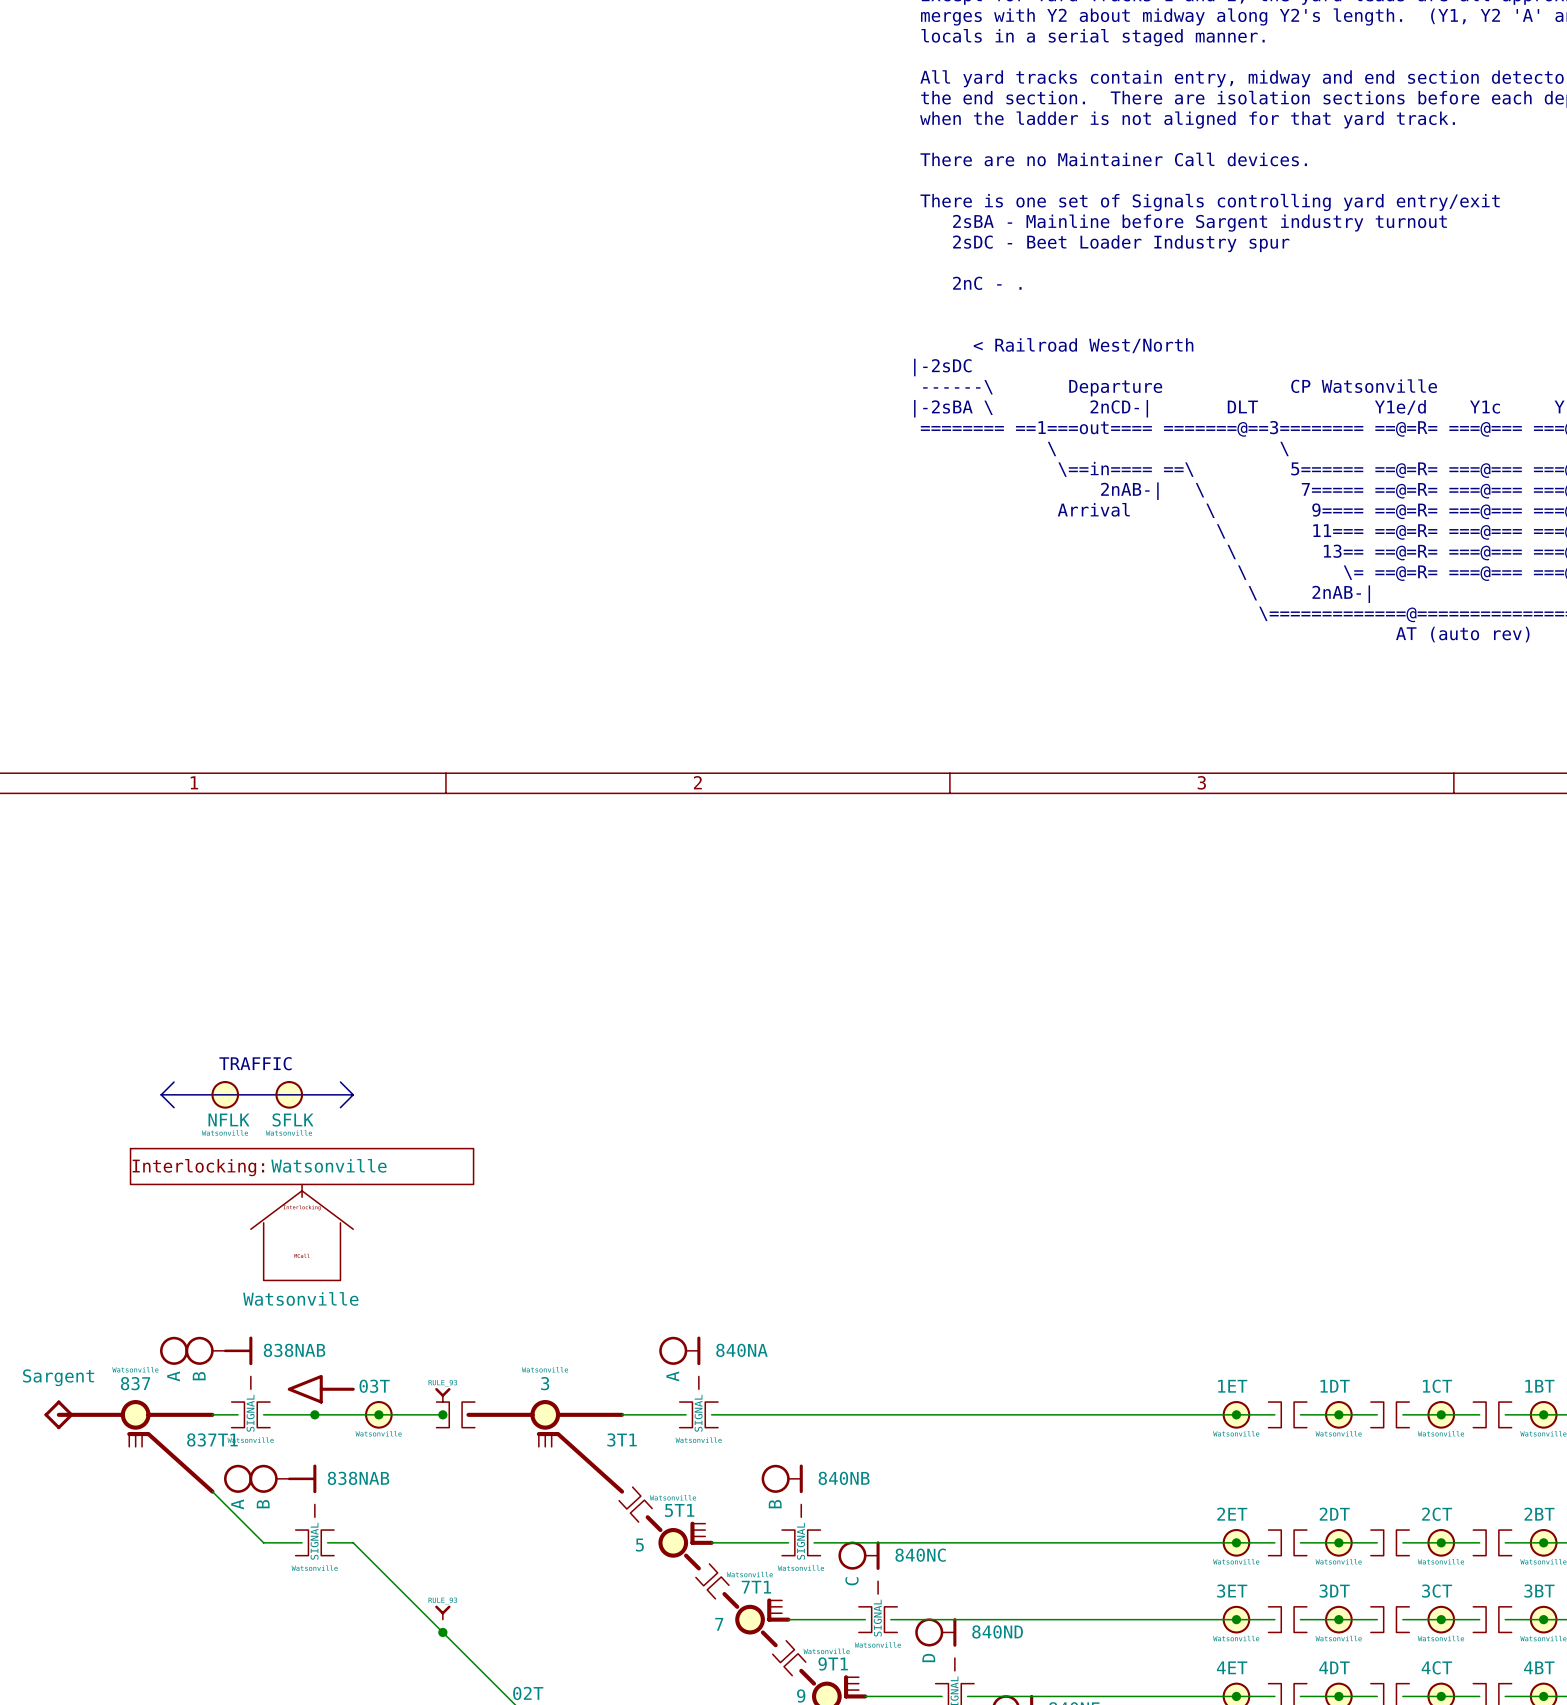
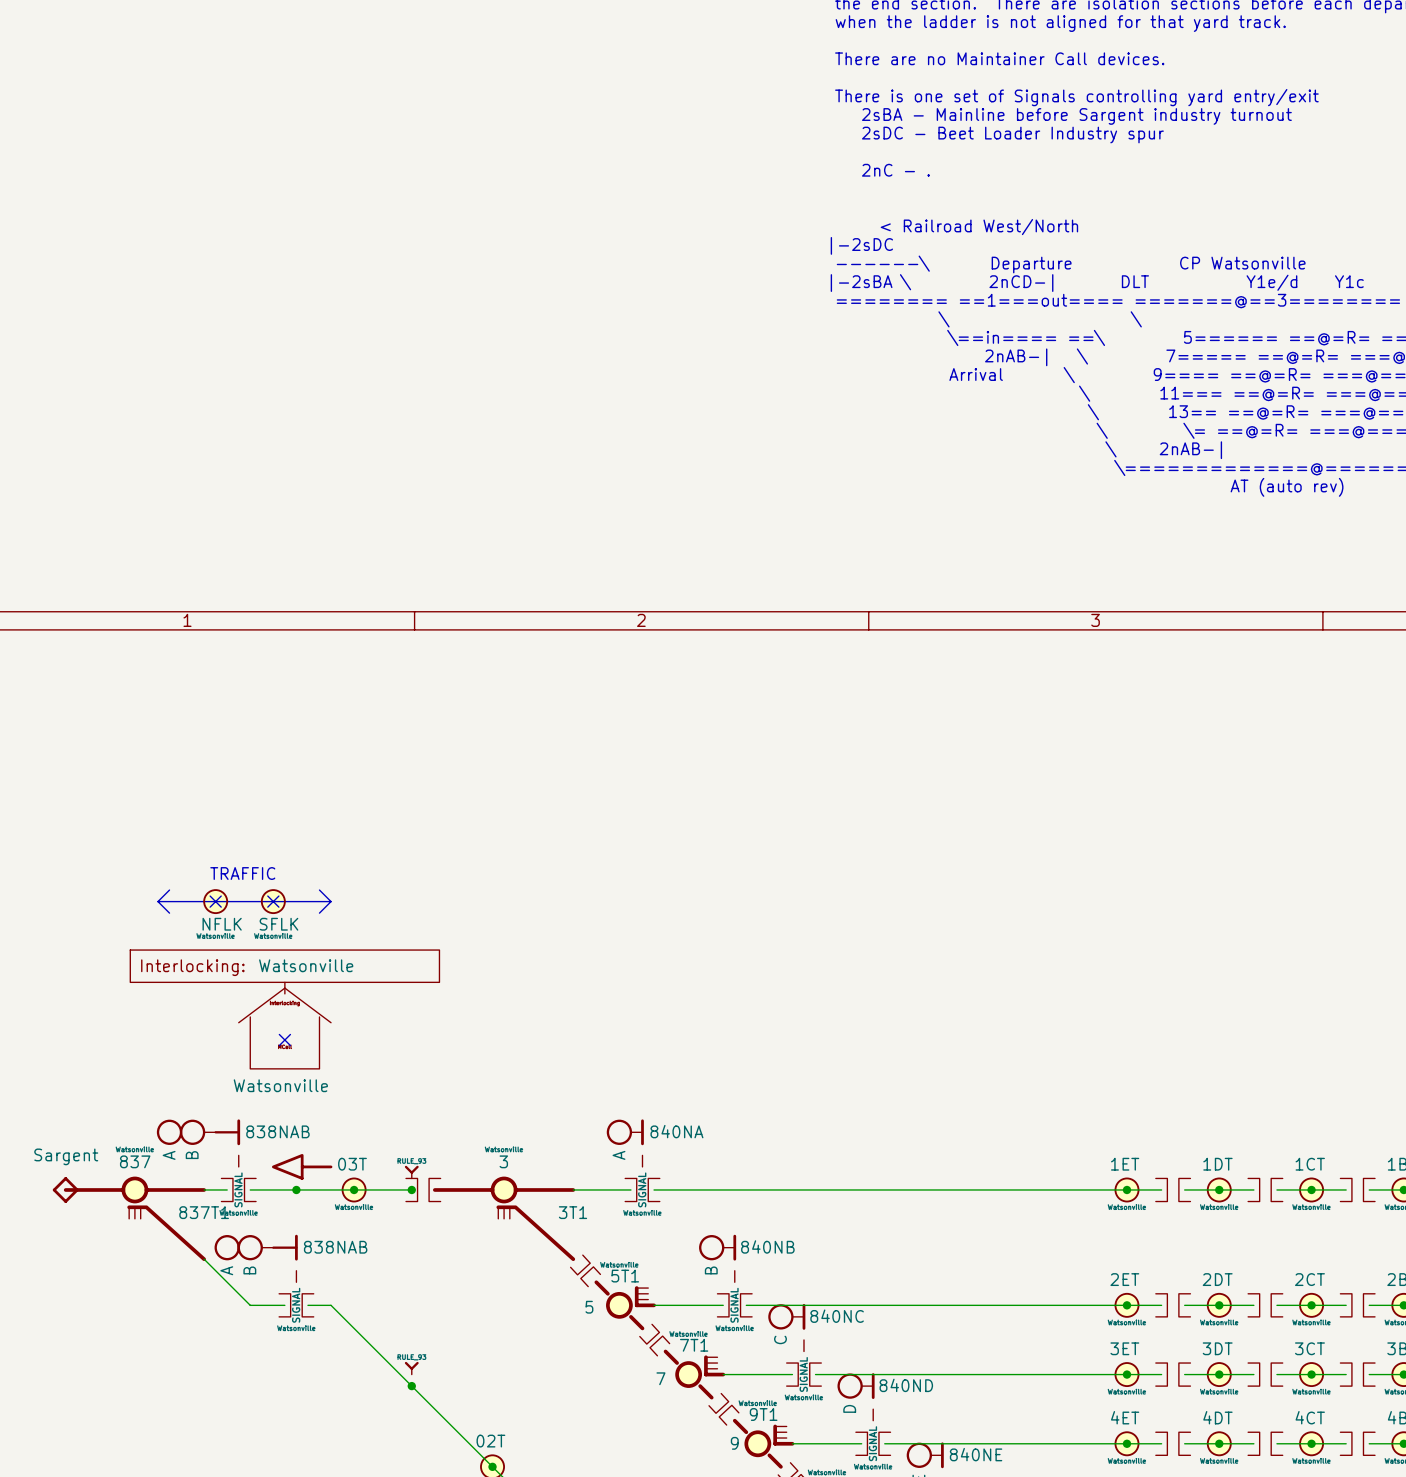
no-connect mark: none -> (215, 901)
no-connect mark: none -> (273, 901)
no-connect mark: none -> (284, 1040)

